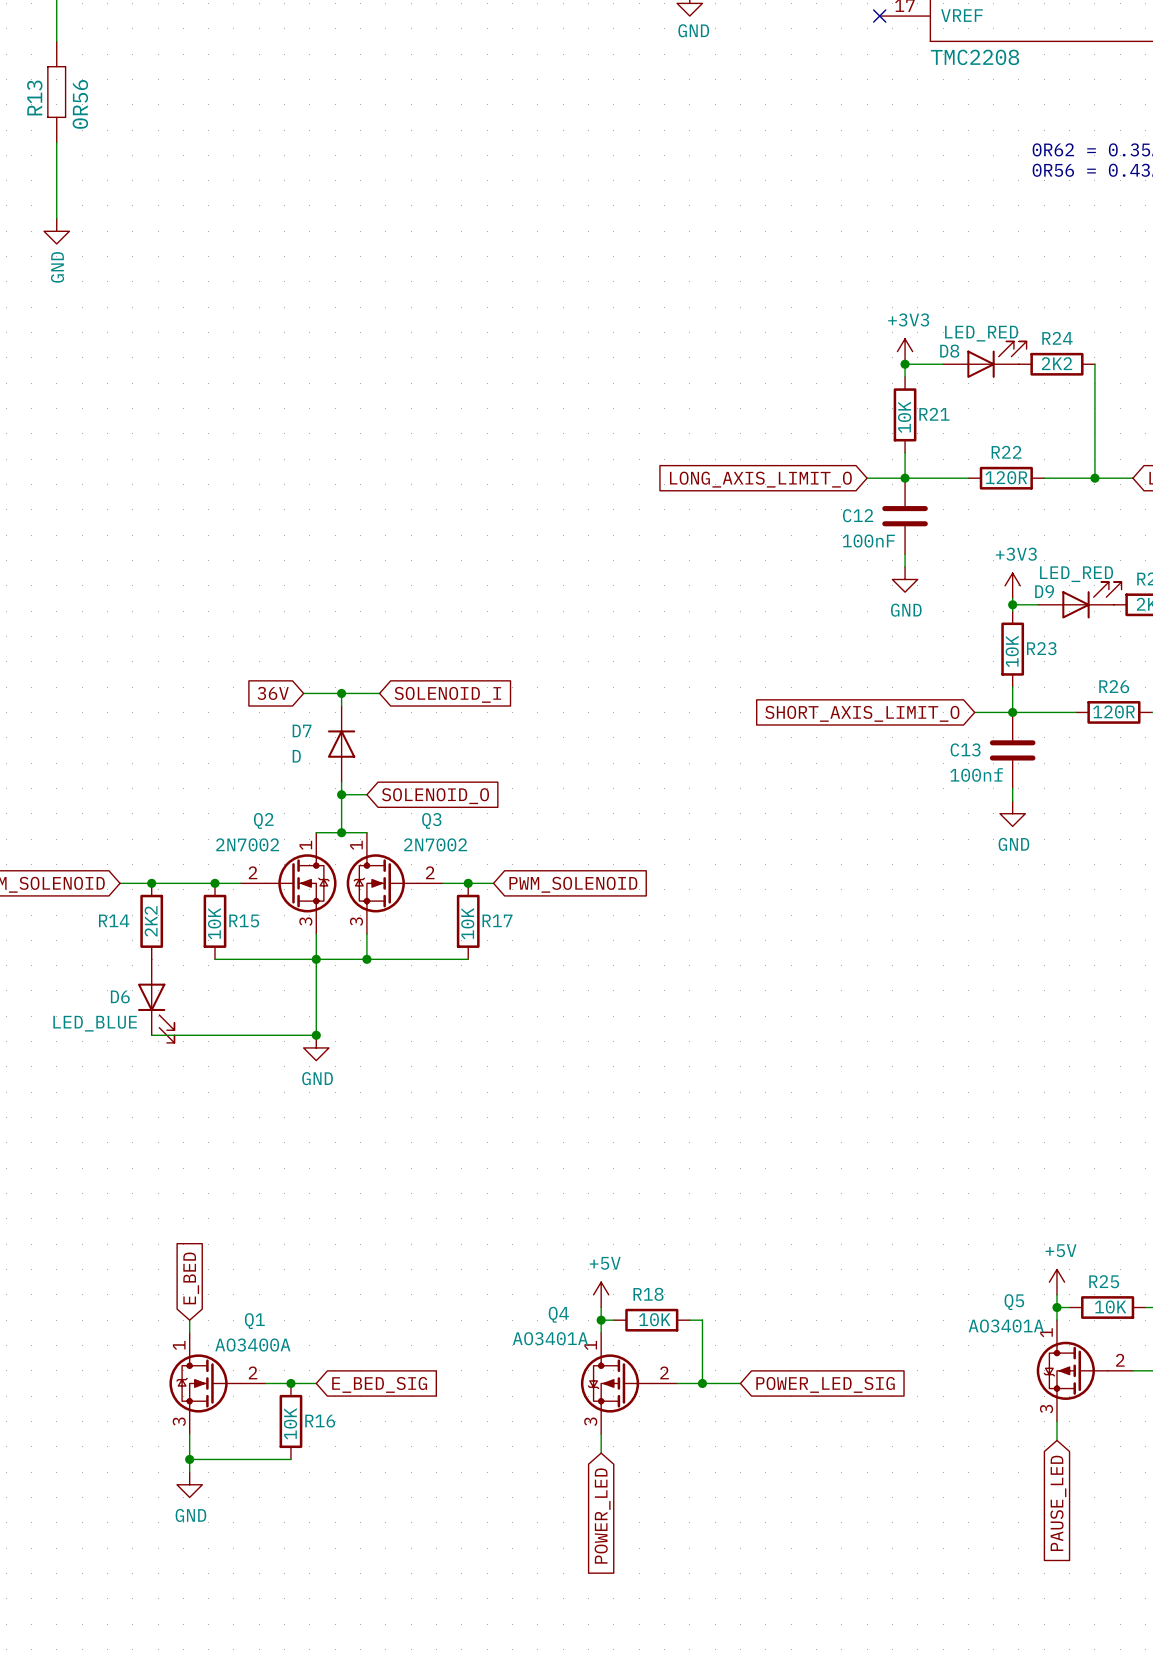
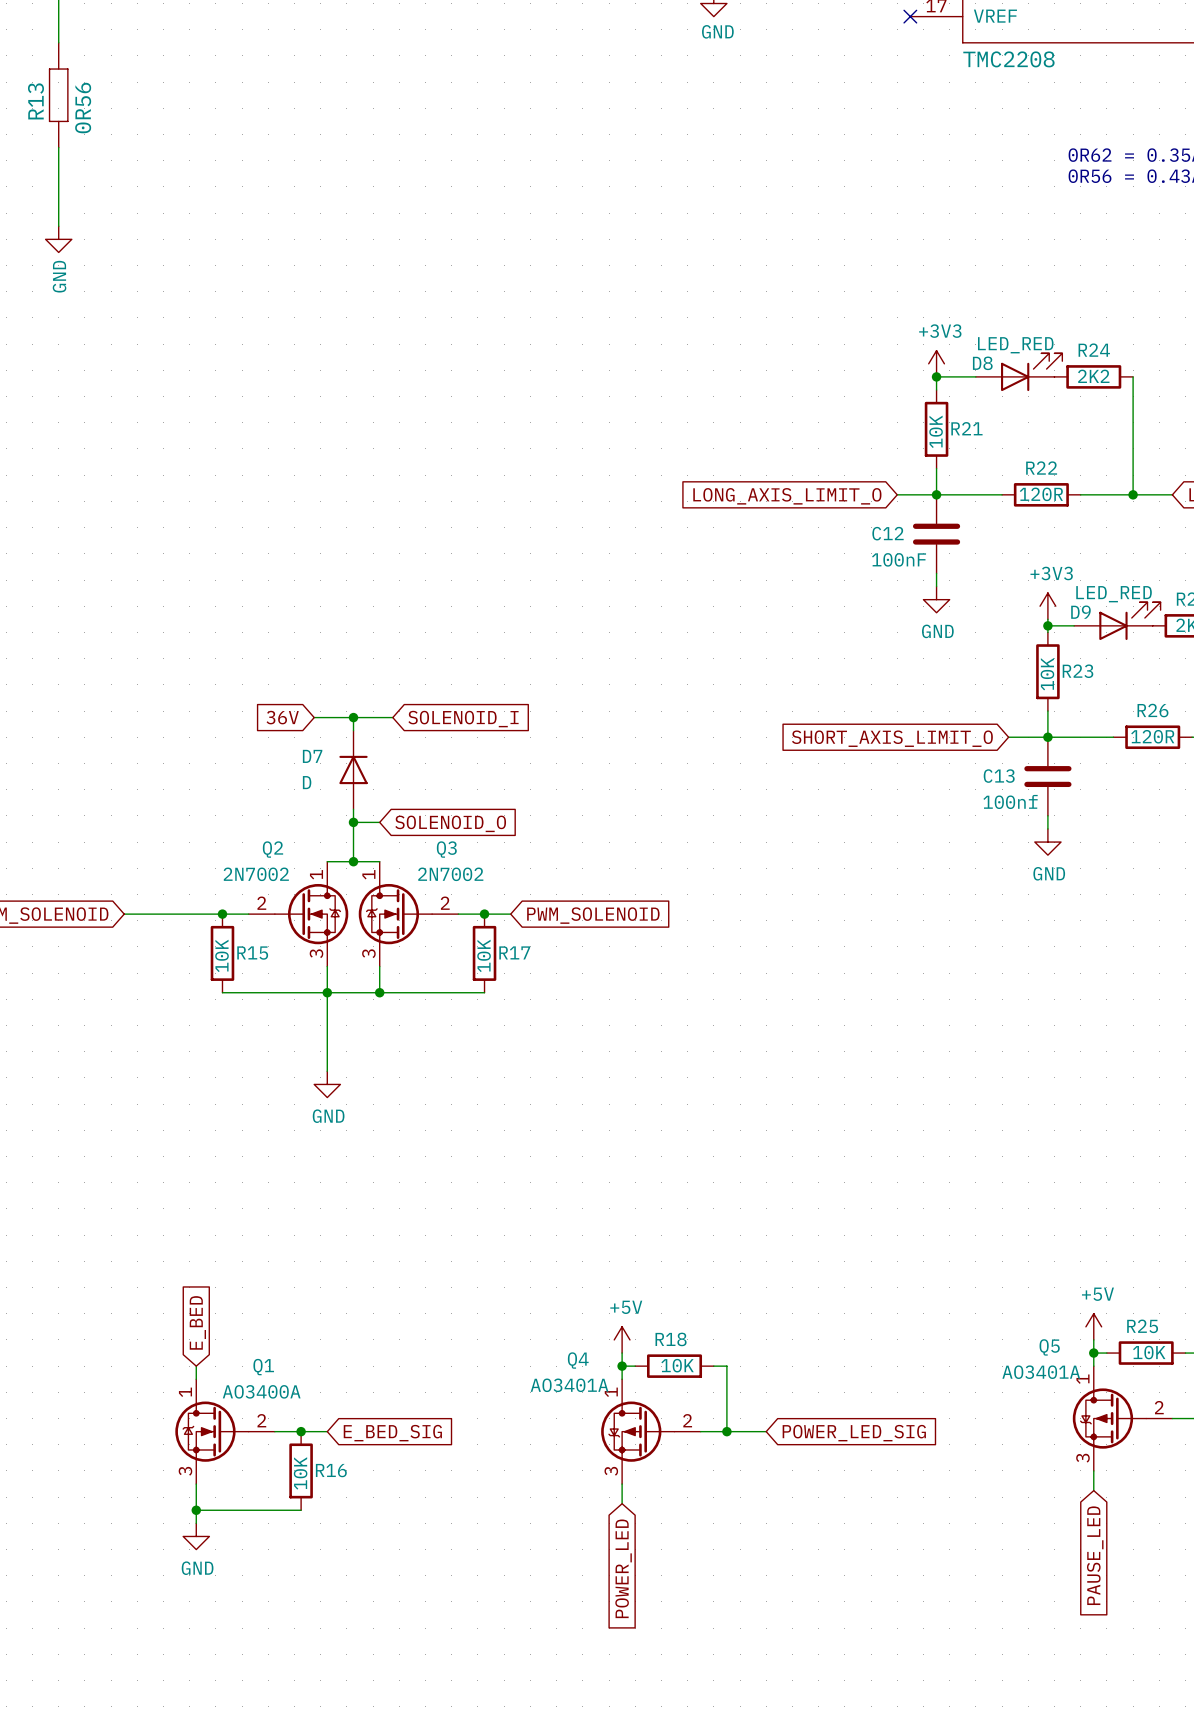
junction: (151, 883) -> none
R14: 2K2 (151, 921) -> none
D6: LED_BLUE (156, 1001) -> none
wire: (151, 1035) (316, 1035) -> none
junction: (316, 1035) -> none

